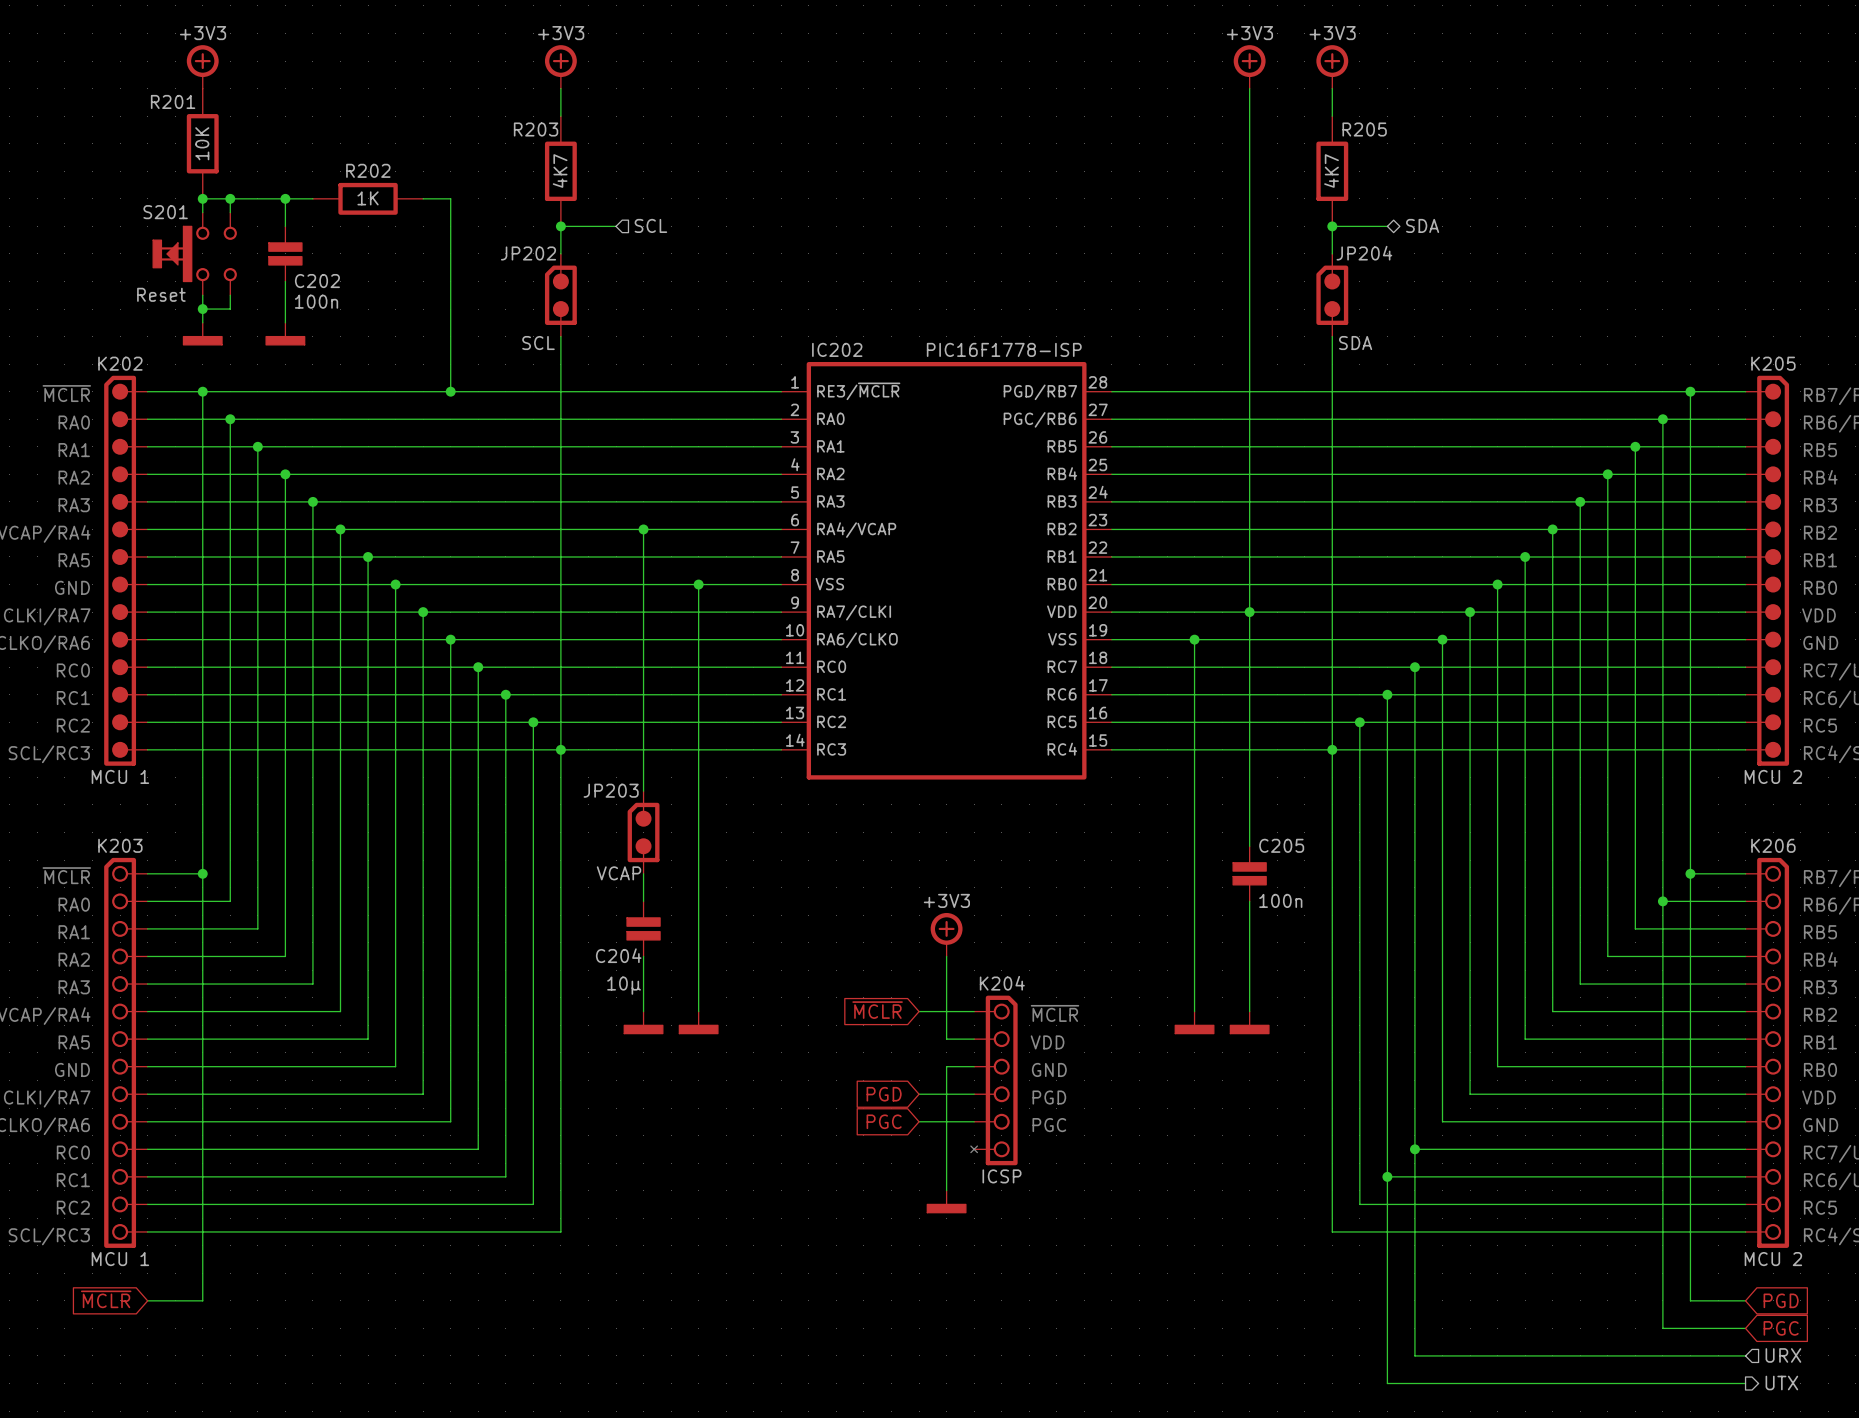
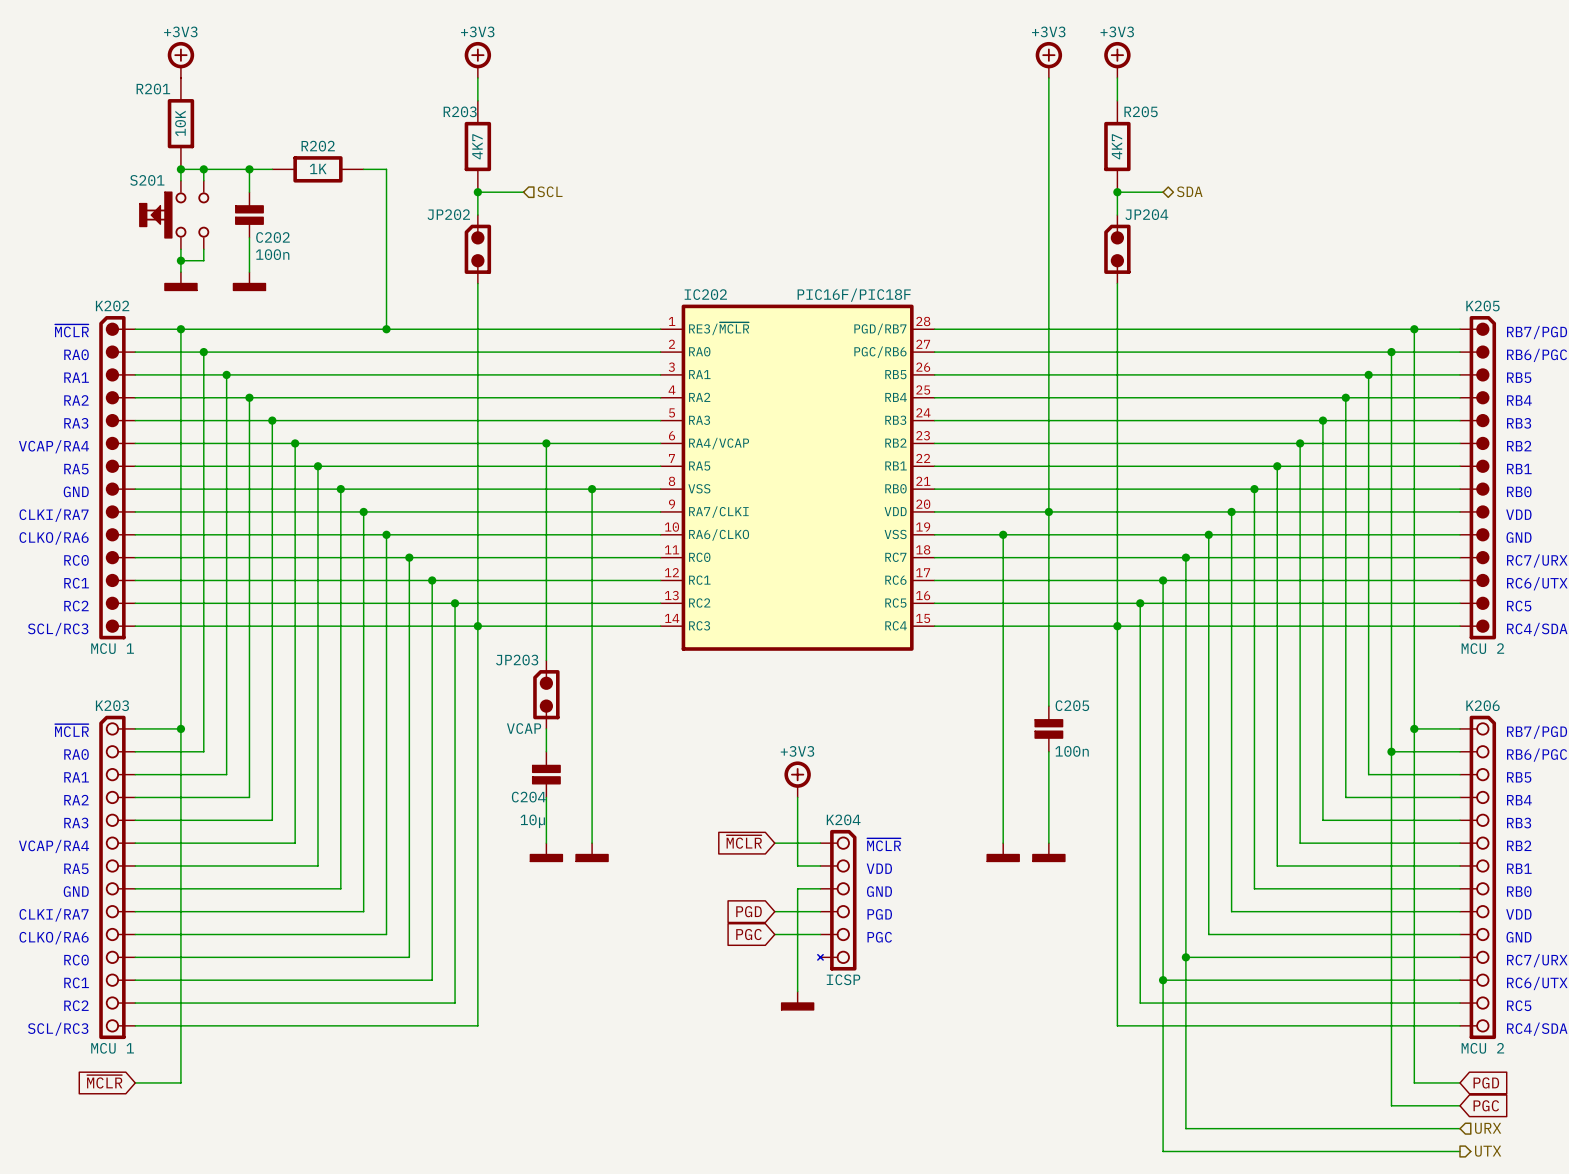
S201 value: Reset (161, 294) -> none
JP202 value: SCL (538, 343) -> none
JP204 value: SDA (1355, 343) -> none
IC202 text: PIC16F1778-ISP (1004, 349) -> PIC16F/PIC18F (854, 295)

